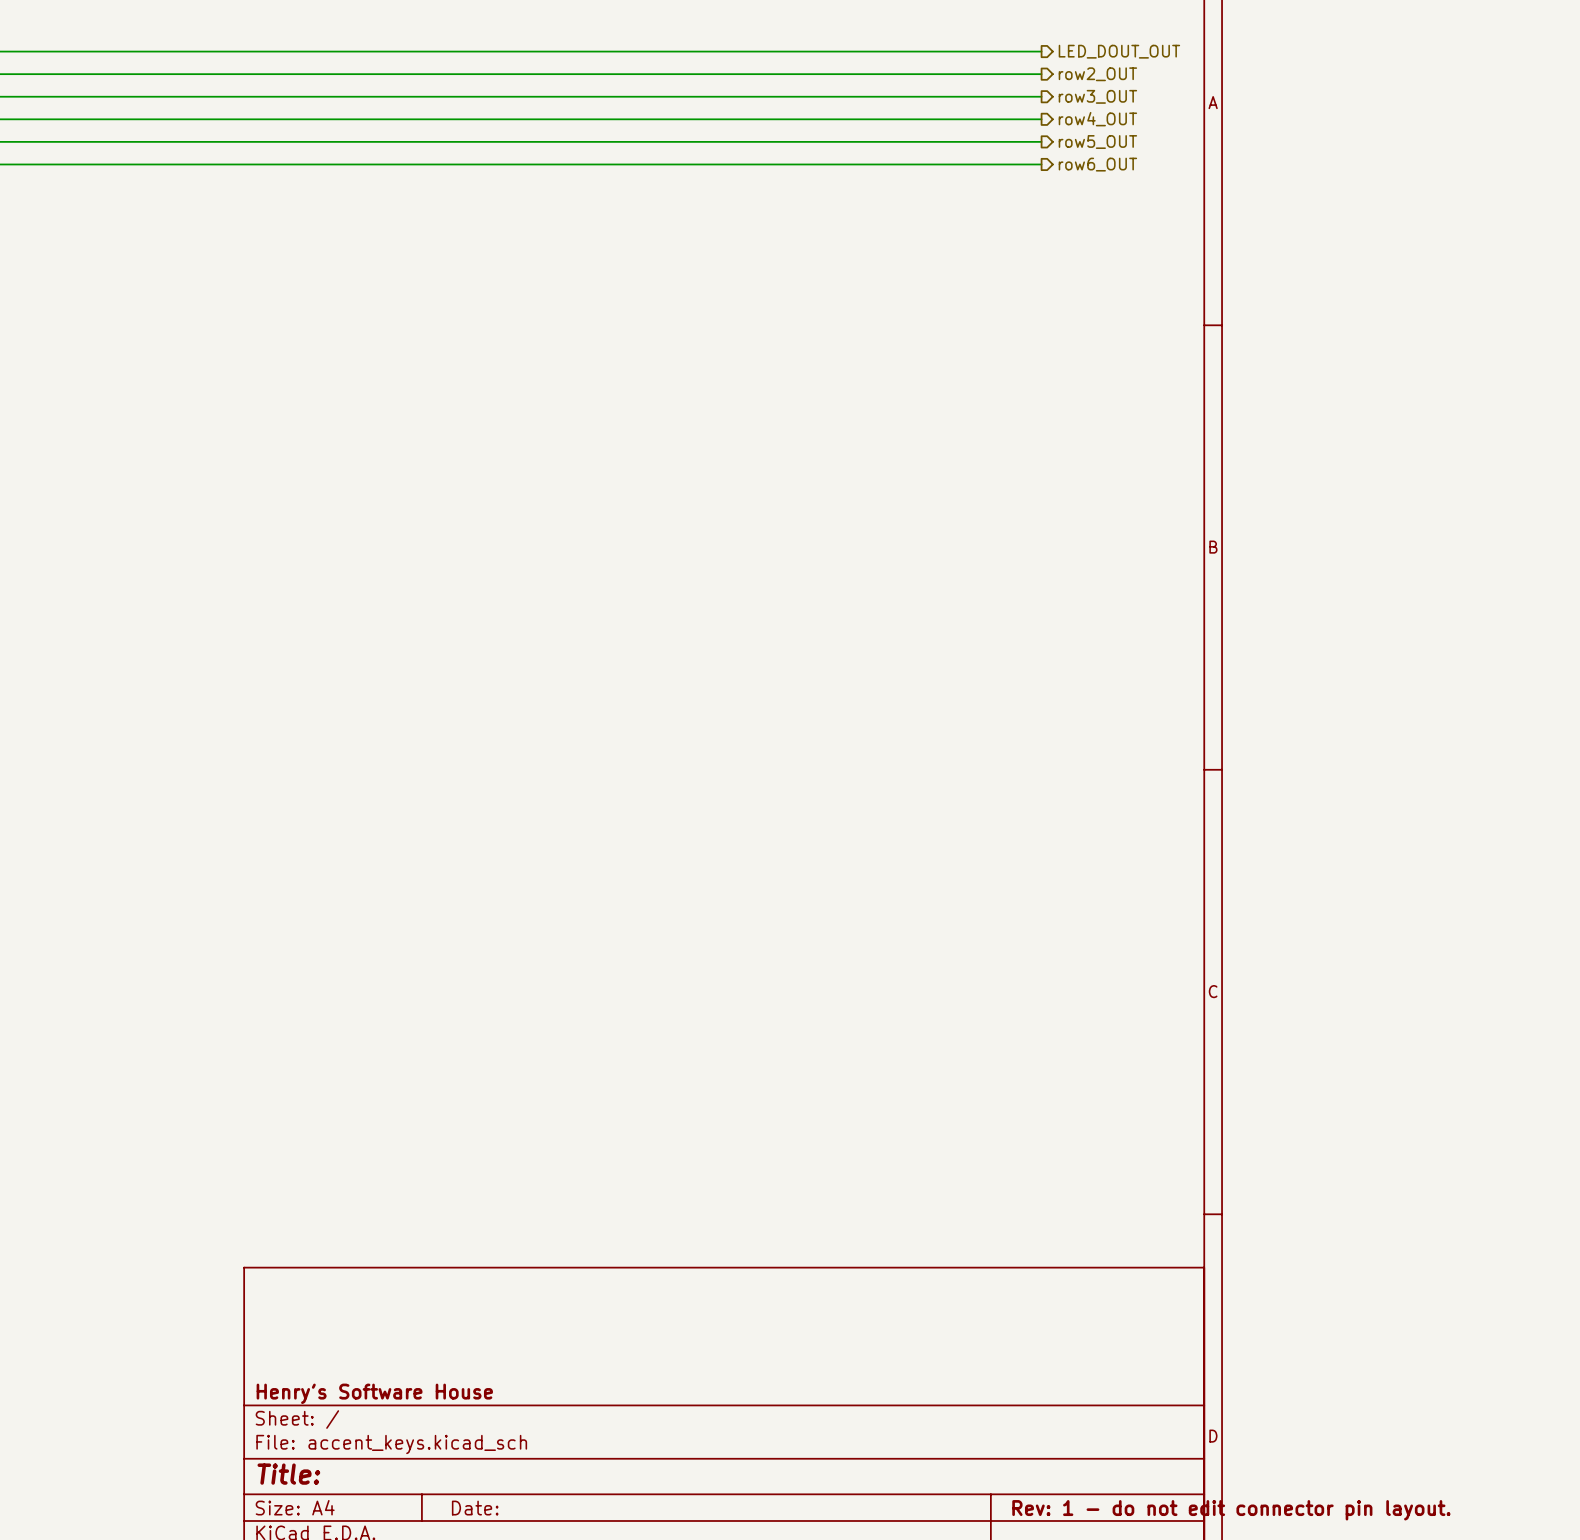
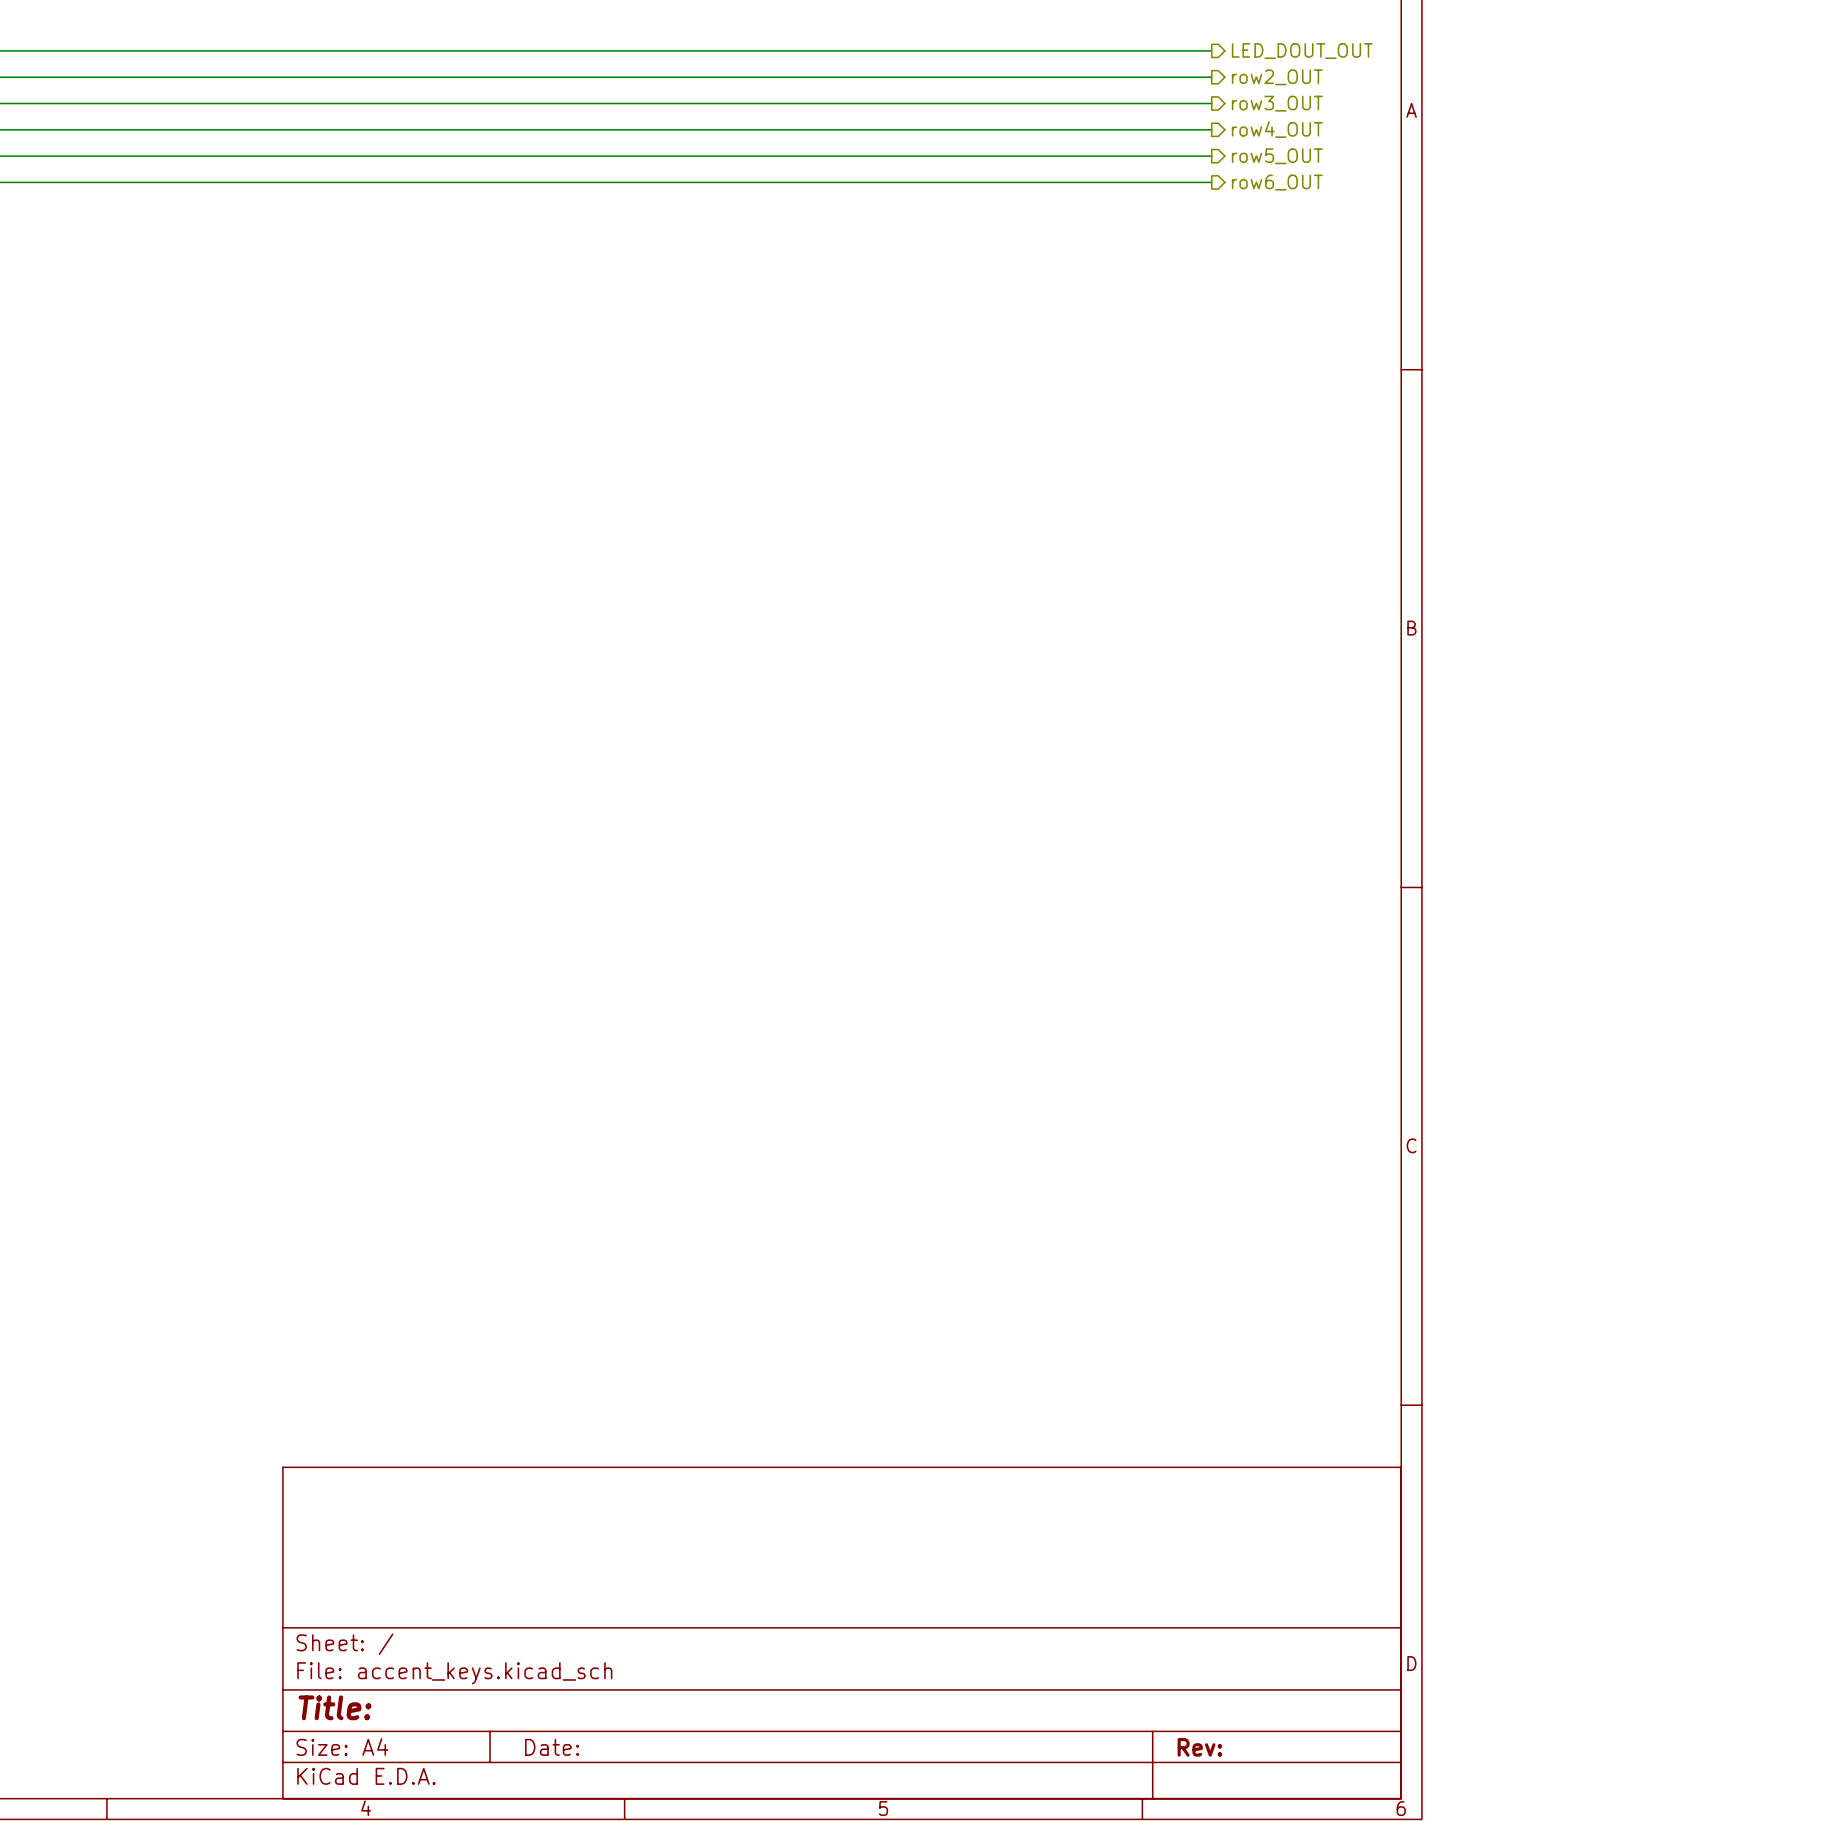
title block: Henry's Software House (374, 1393) -> none
title block: Rev: 1 - do not edit connector pin layout. (1231, 1510) -> Rev: (1199, 1747)

